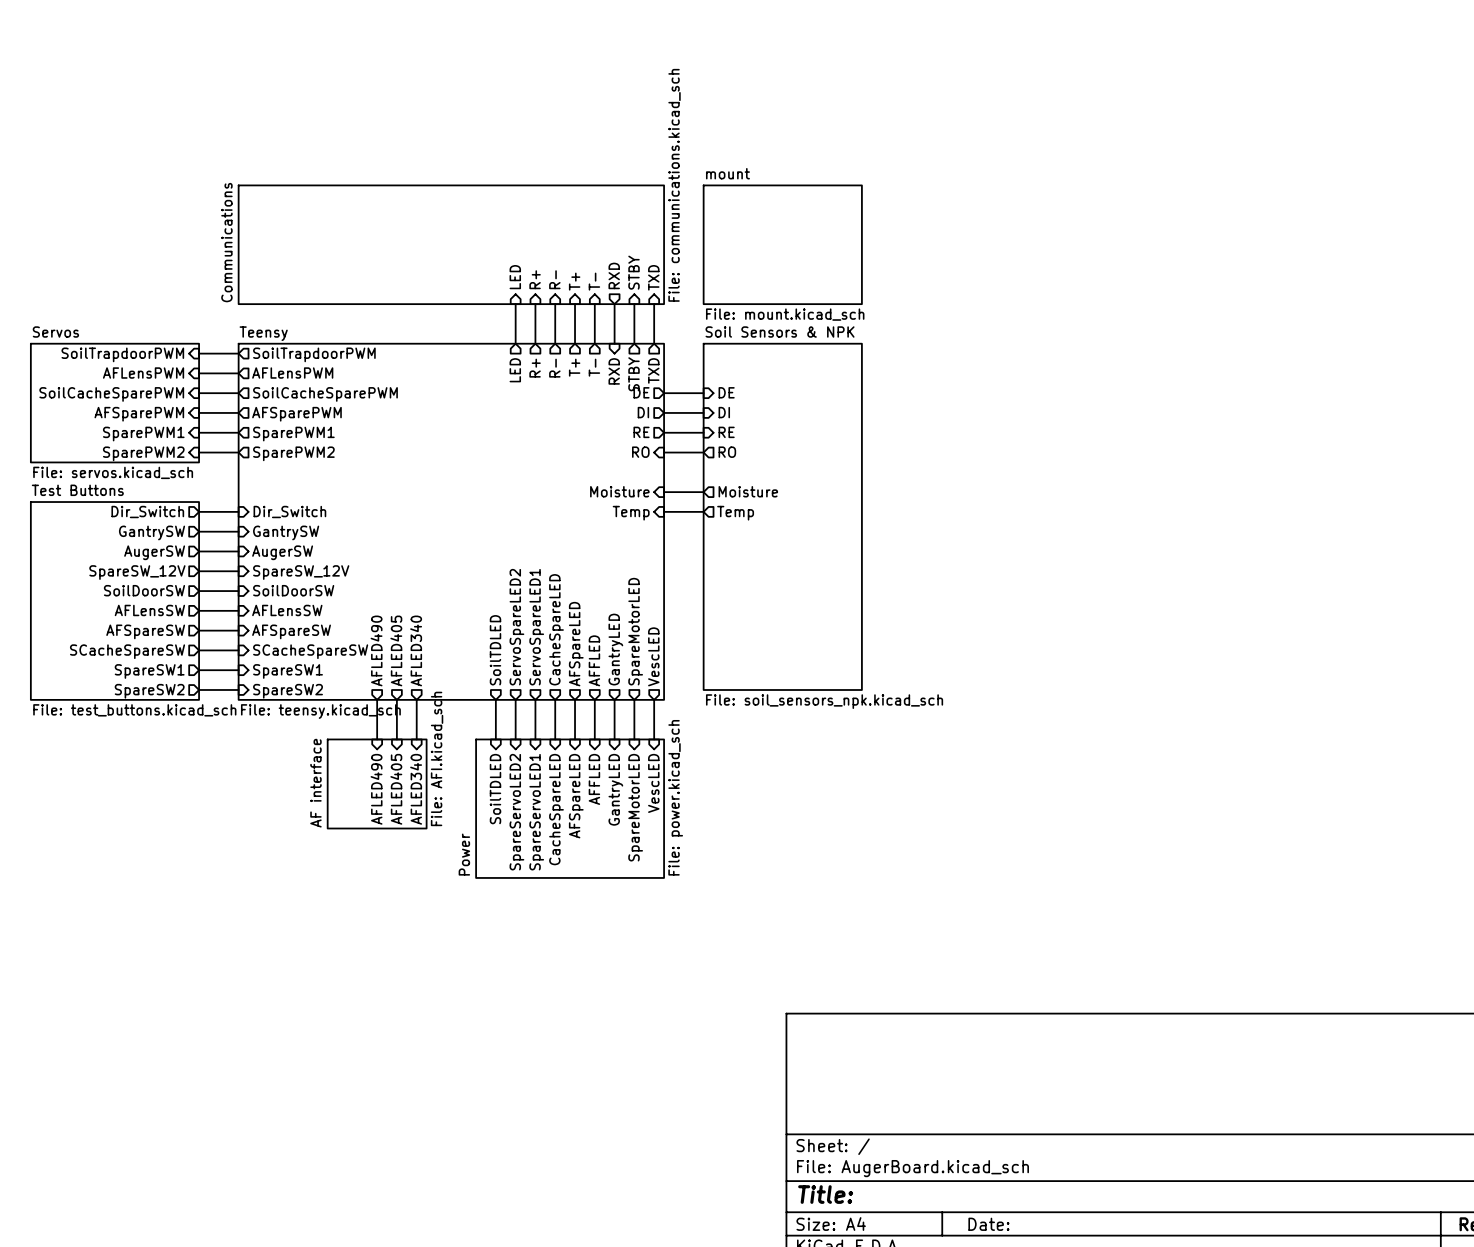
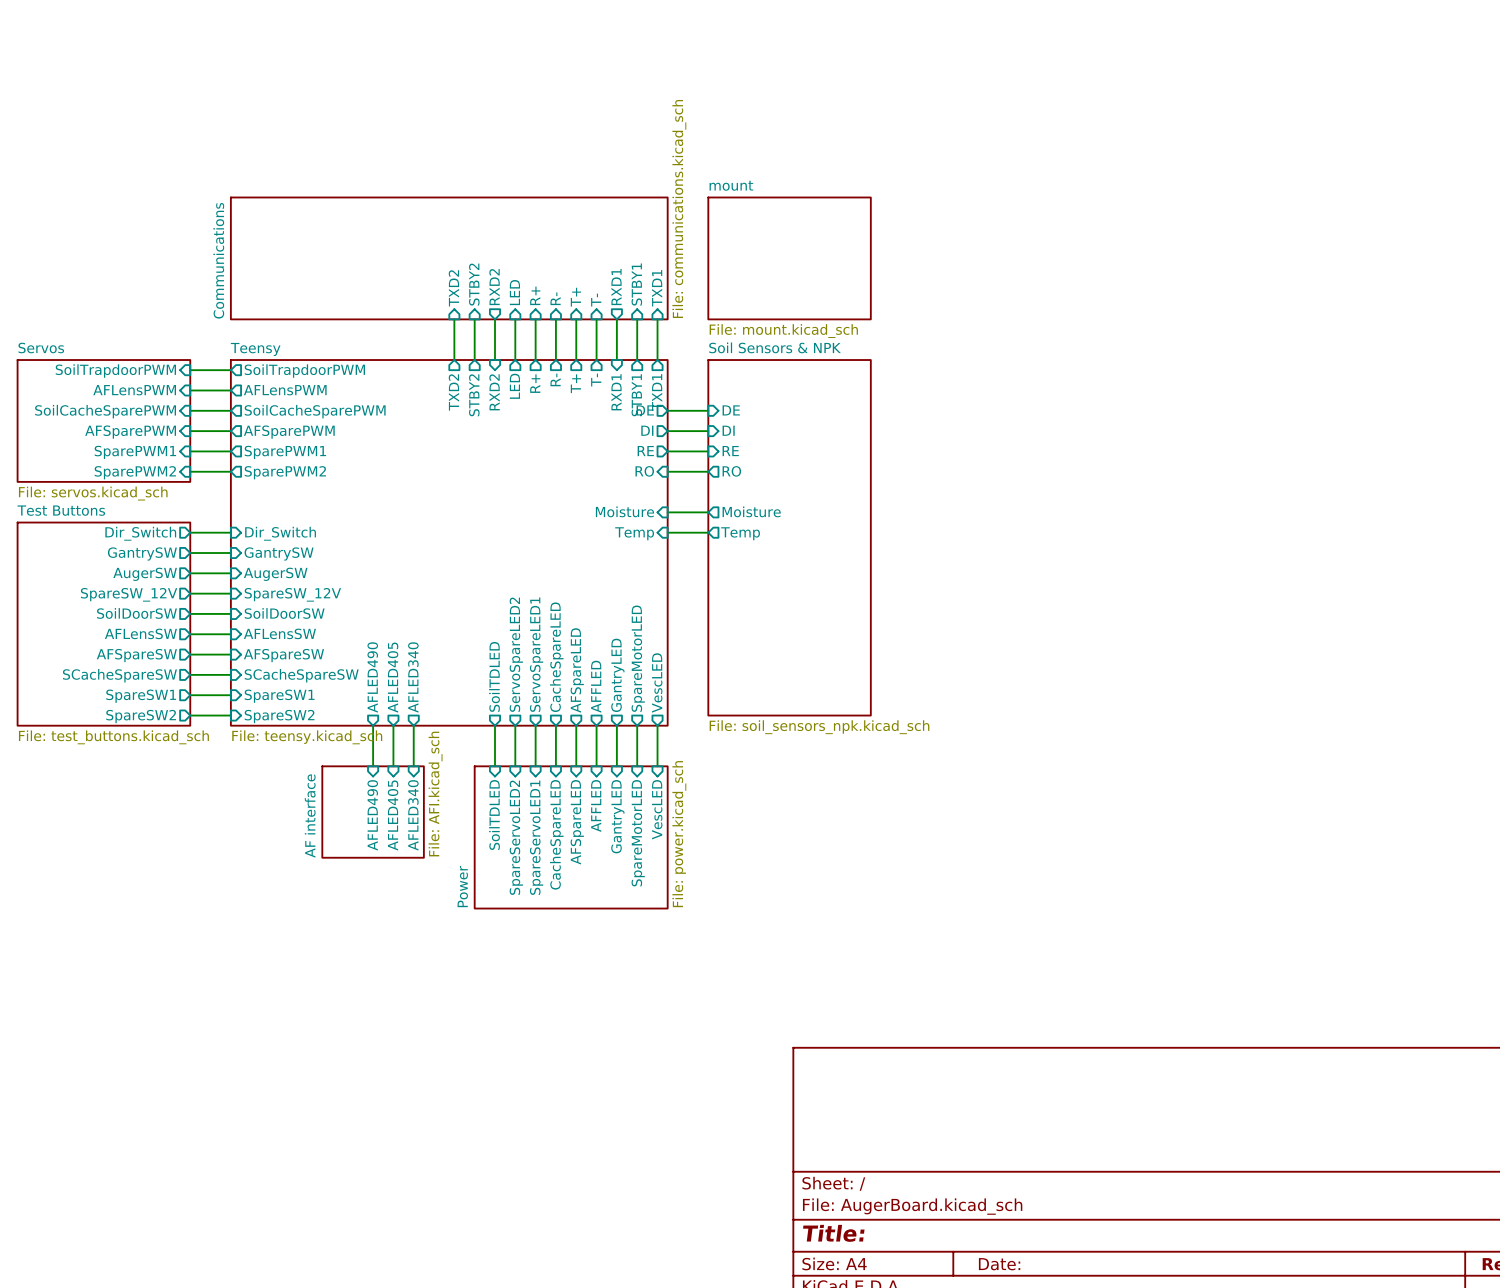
sheet pin: none -> STBY2 (474, 284)
sheet pin: none -> RXD2 (494, 287)
sheet pin: STBY (634, 272) -> STBY1 (636, 284)
sheet pin: none -> TXD2 (453, 288)
sheet pin: RXD (614, 275) -> RXD1 (616, 287)
sheet pin: TXD (653, 277) -> TXD1 (657, 288)
wire: none -> (454, 319) (454, 360)
wire: none -> (474, 319) (474, 360)
wire: none -> (494, 319) (494, 360)
sheet pin: TXD (653, 370) -> TXD1 (657, 392)
sheet pin: RXD (614, 371) -> RXD1 (616, 392)
sheet pin: STBY (634, 374) -> STBY1 (636, 395)
sheet pin: none -> TXD2 (453, 392)
sheet pin: none -> RXD2 (494, 392)
sheet pin: none -> STBY2 (474, 395)

